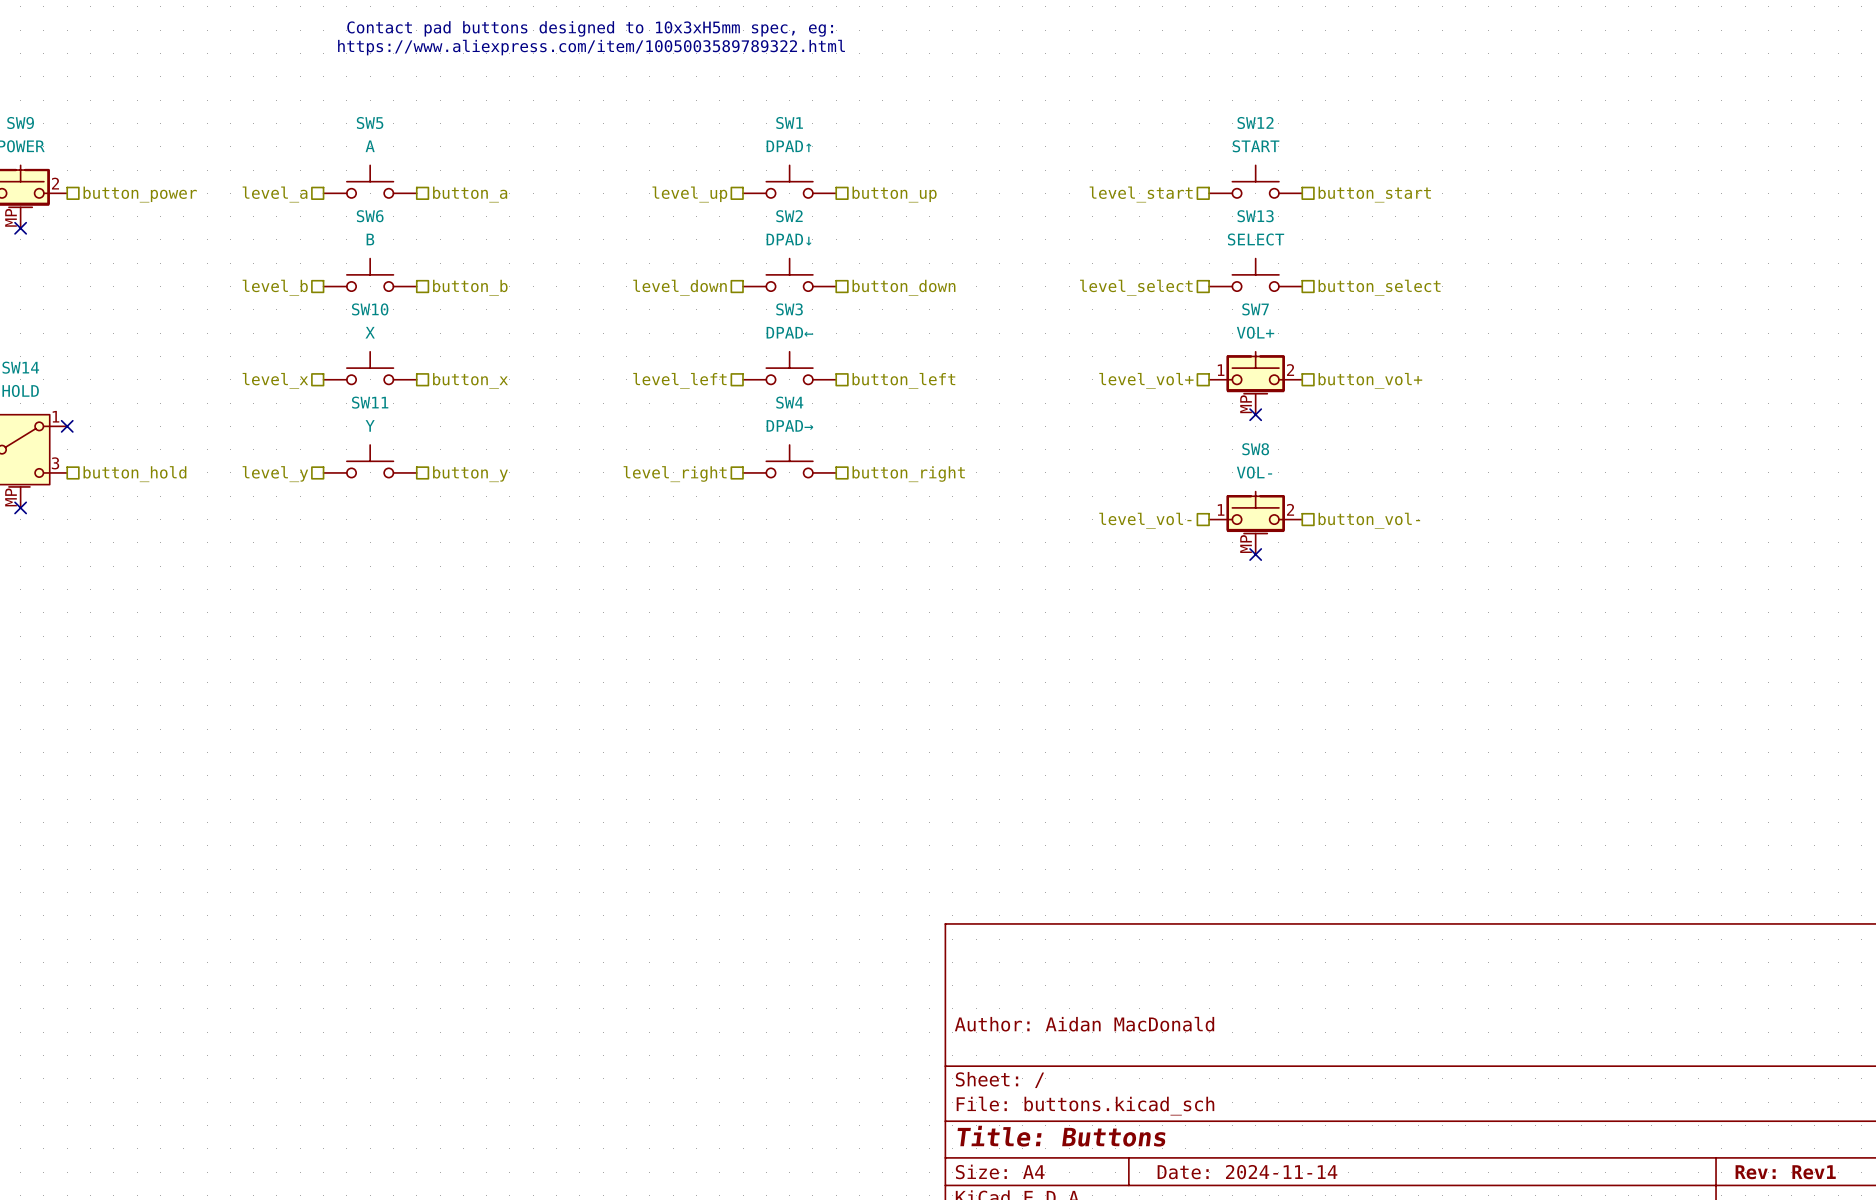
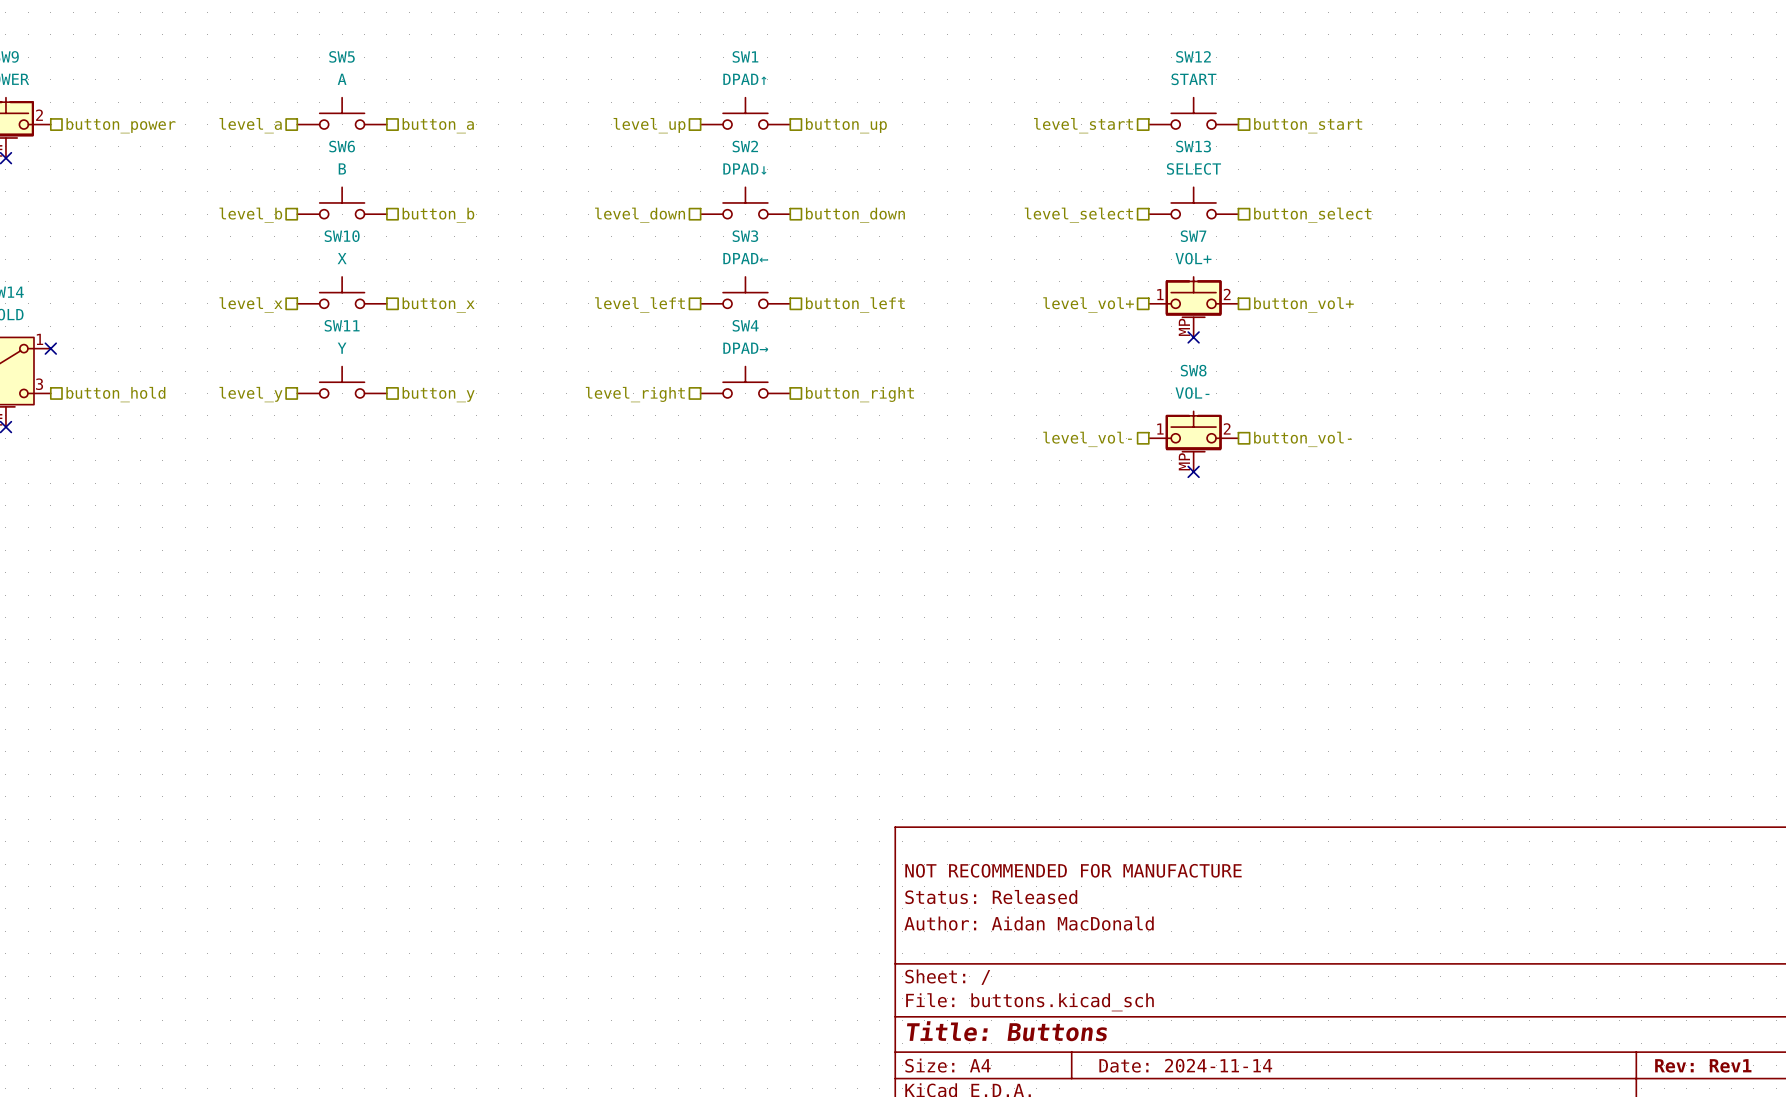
title block: none -> NOT RECOMMENDED FOR MANUFACTURE (1073, 870)
title block: none -> Status: Released (991, 897)

